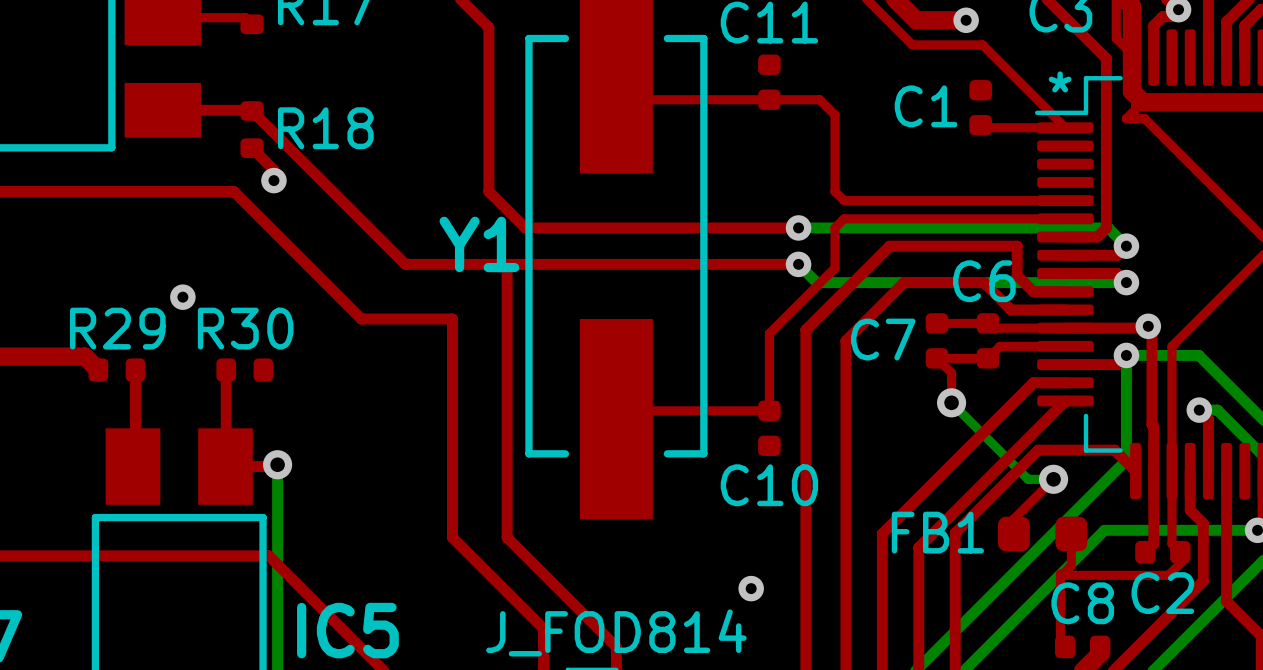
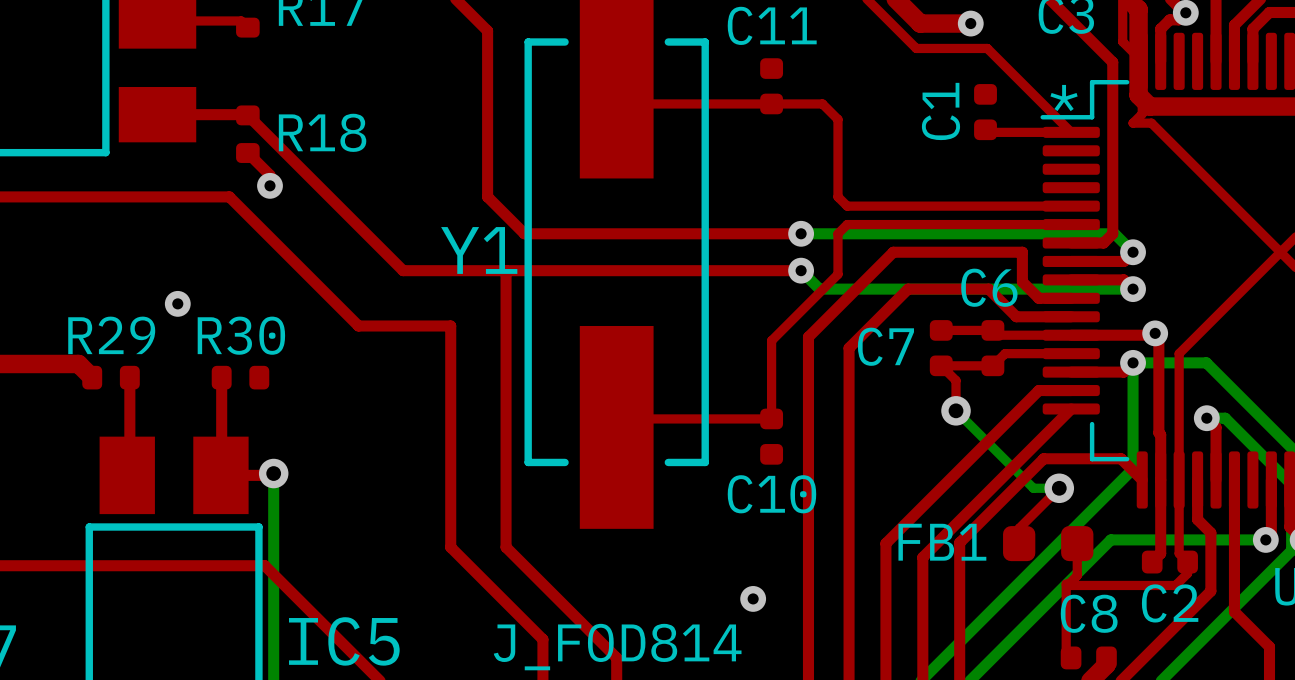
C1 name rotation: 0° (926, 106) -> 90° counterclockwise (940, 111)

